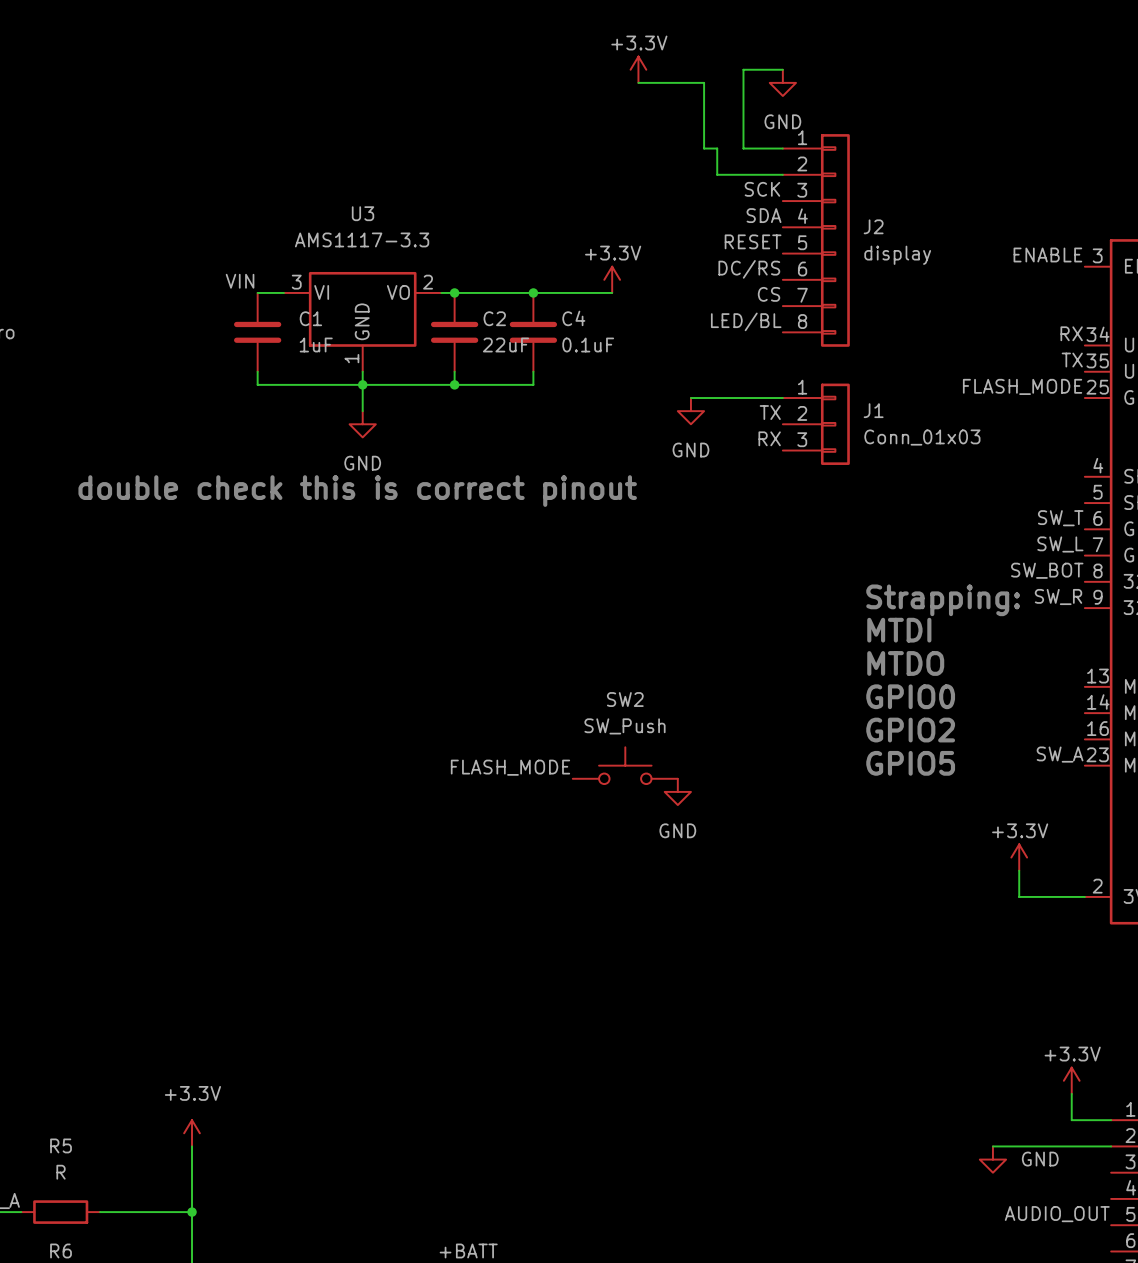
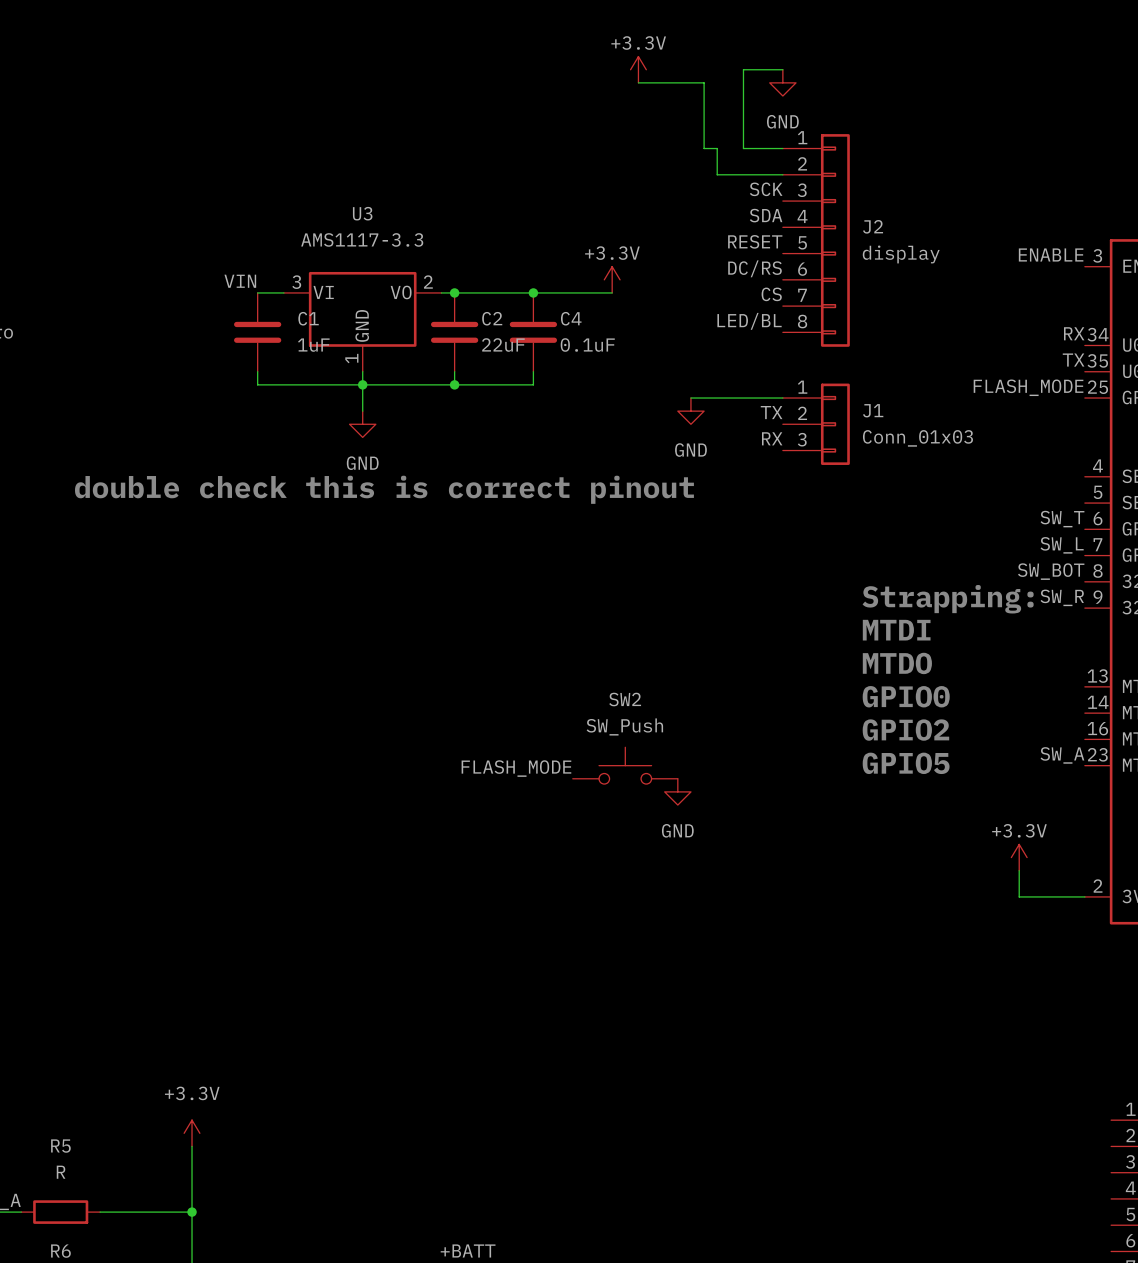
power symbol: +3.3V (1071, 1080) -> none
wire: (1071, 1093) (1071, 1120) (1111, 1120) -> none
wire: (992, 1146) (1111, 1146) -> none
power symbol: GND (992, 1159) -> none
label: AUDIO_OUT (1057, 1214) -> none

